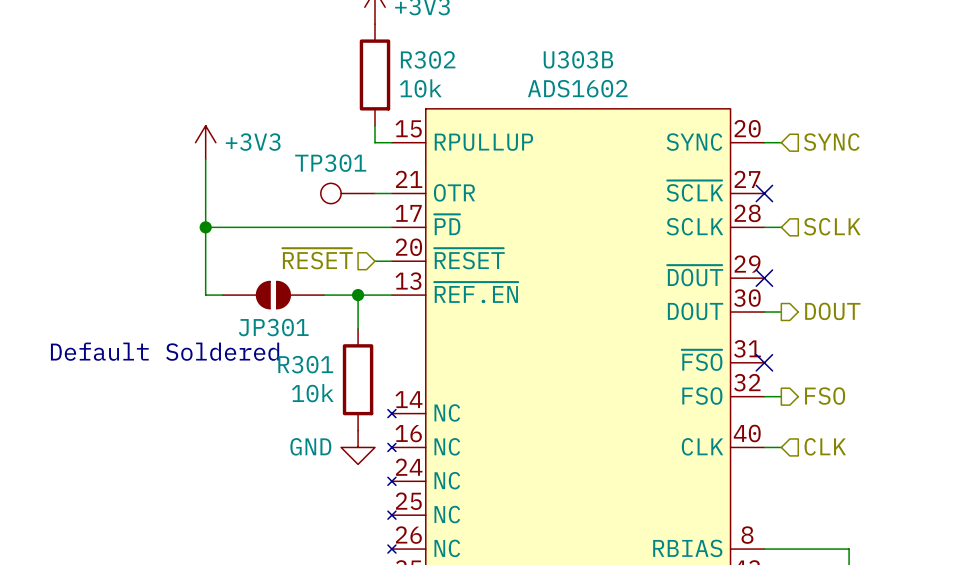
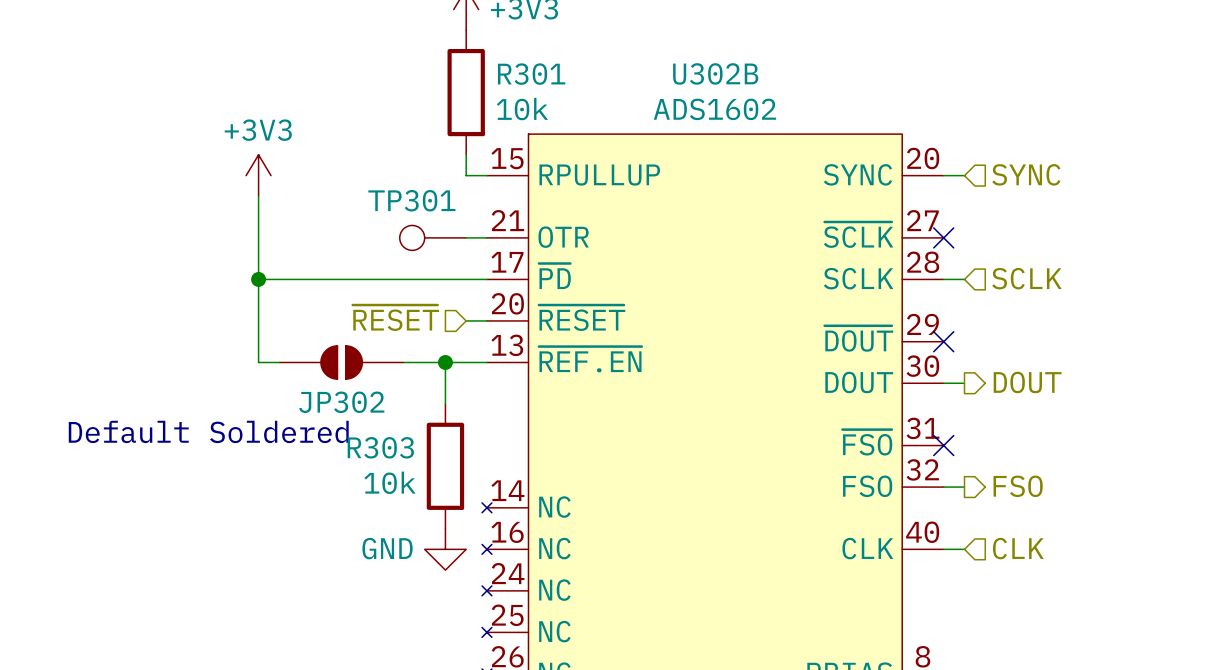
R302 name: R302 (428, 59) -> R301 (531, 74)
U303B name: U303B (578, 59) -> U302B (715, 73)
power symbol text position: +3V3 (253, 142) -> +3V3 (258, 130)
JP301 name: JP301 (273, 327) -> JP302 (341, 402)
R301 name: R301 (305, 364) -> R303 (380, 447)

